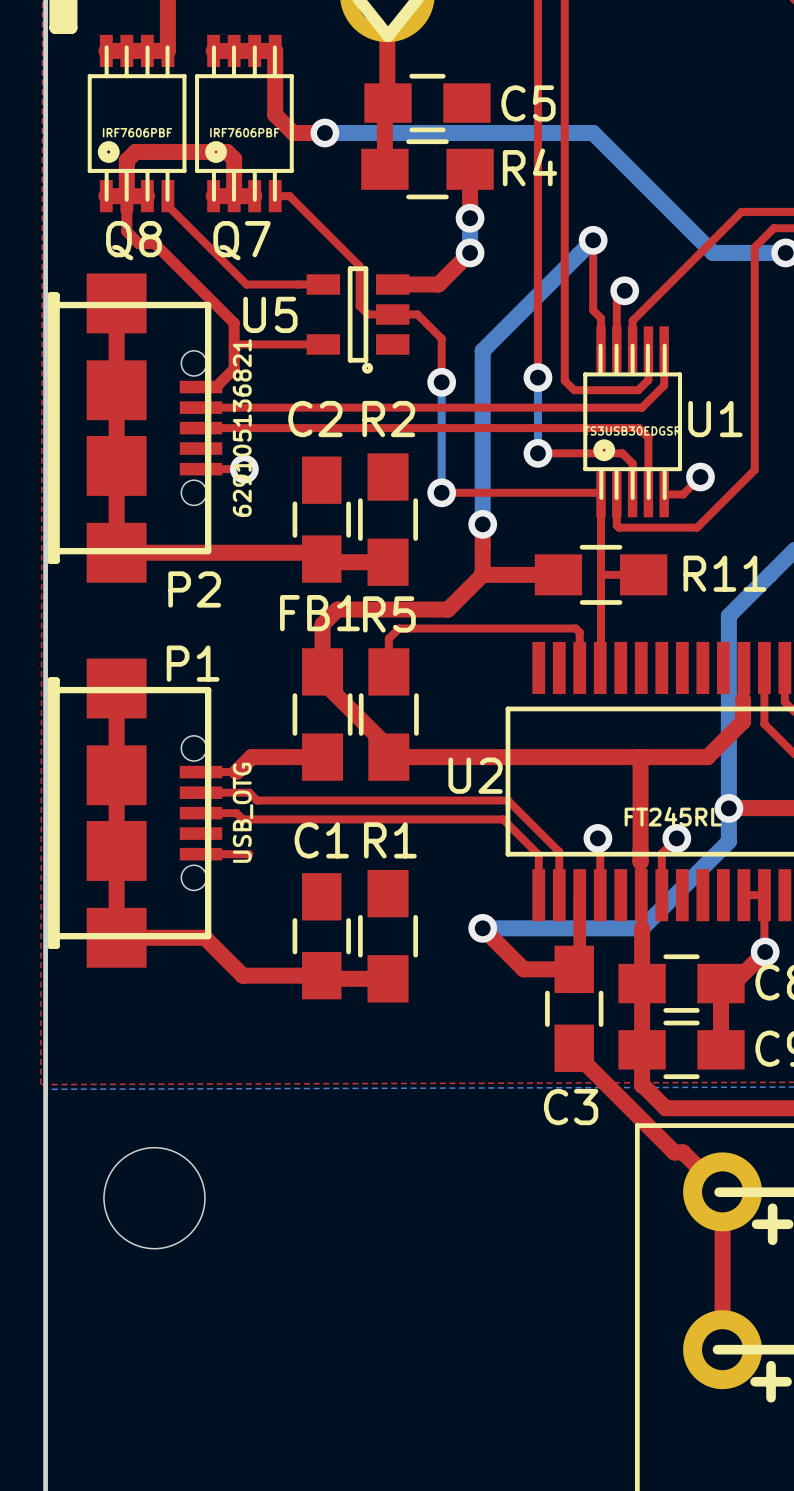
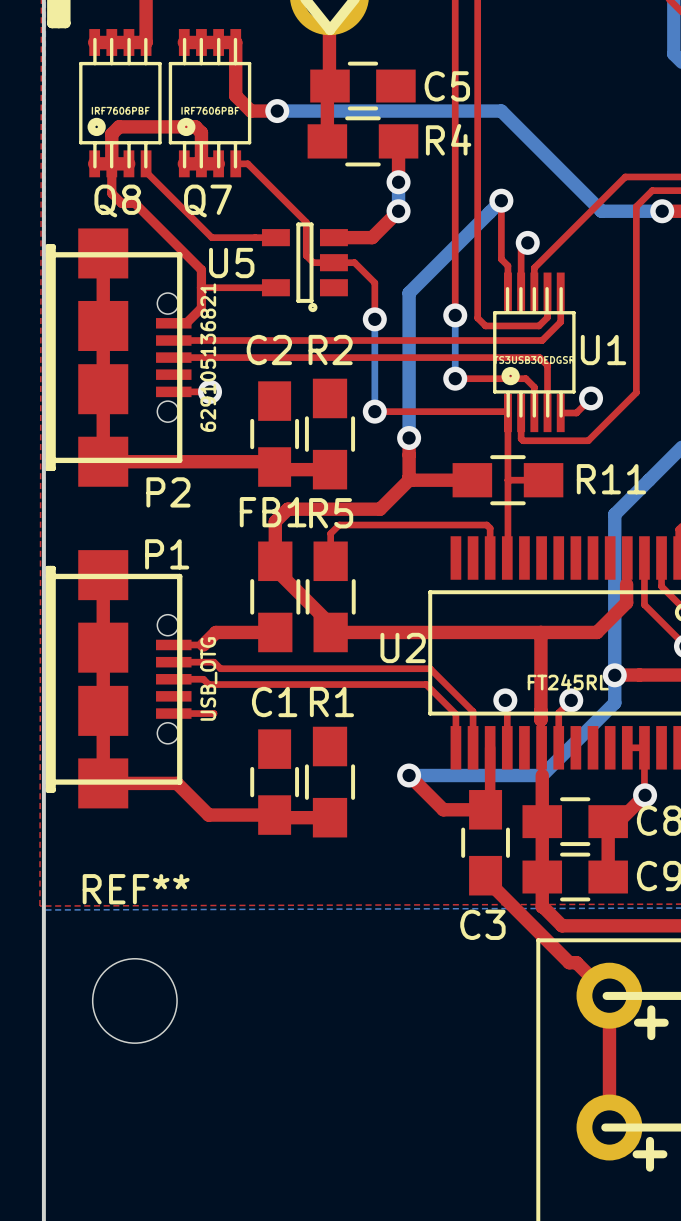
REF** name: none -> REF** (136, 889)

